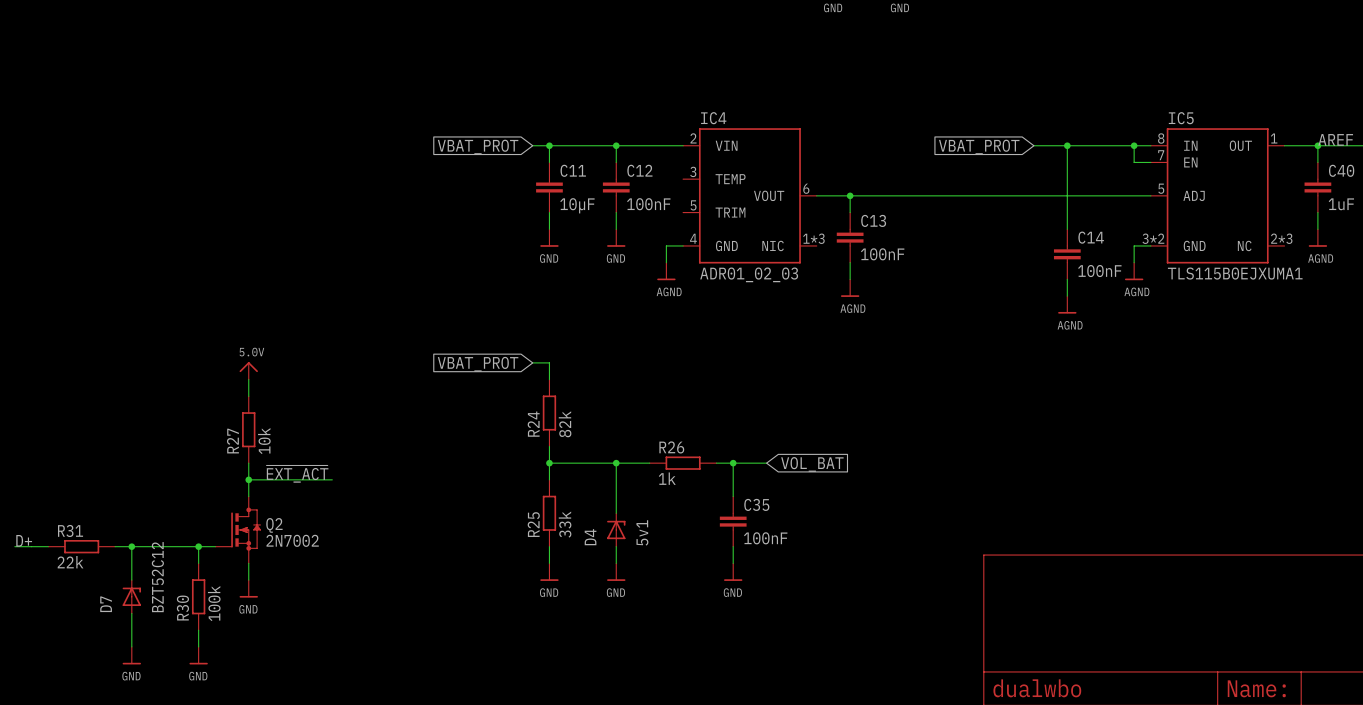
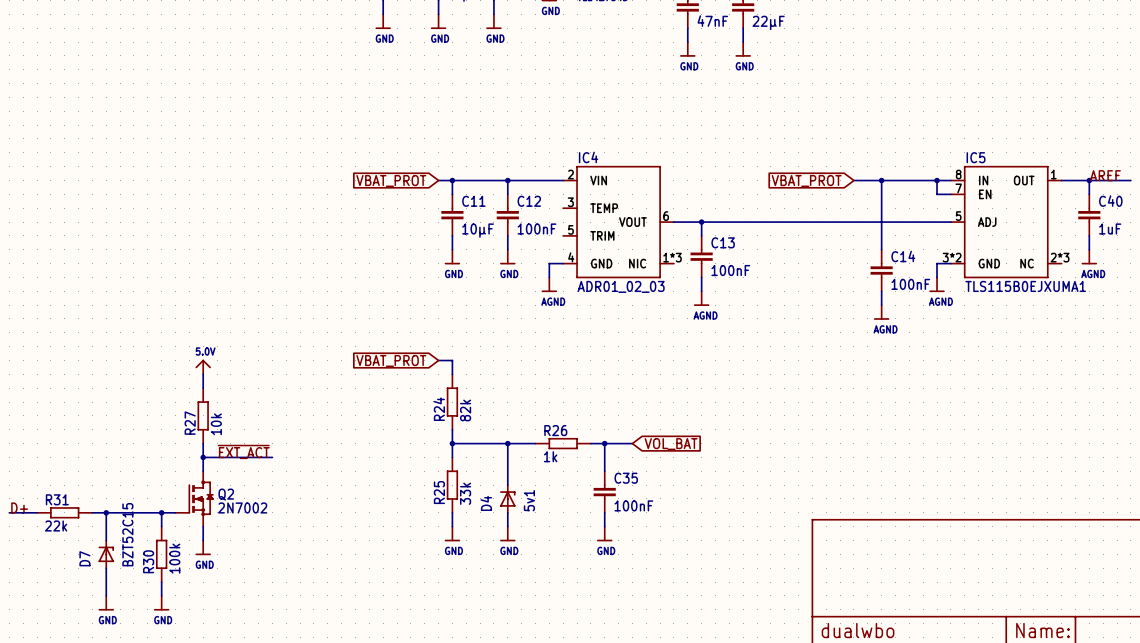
D7 value: BZT52C12 (157, 577) -> BZT52C15 (127, 534)

